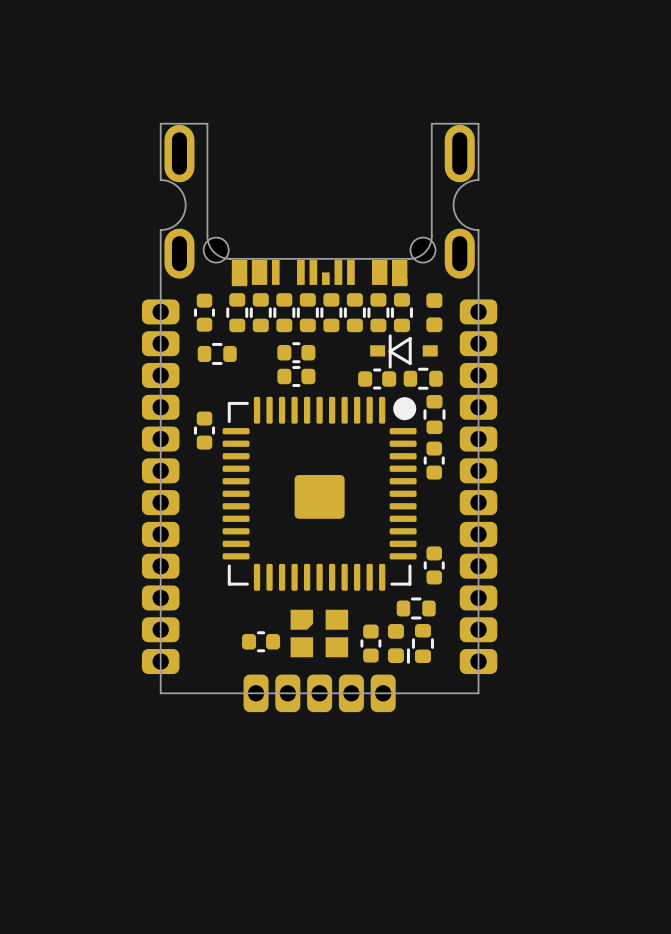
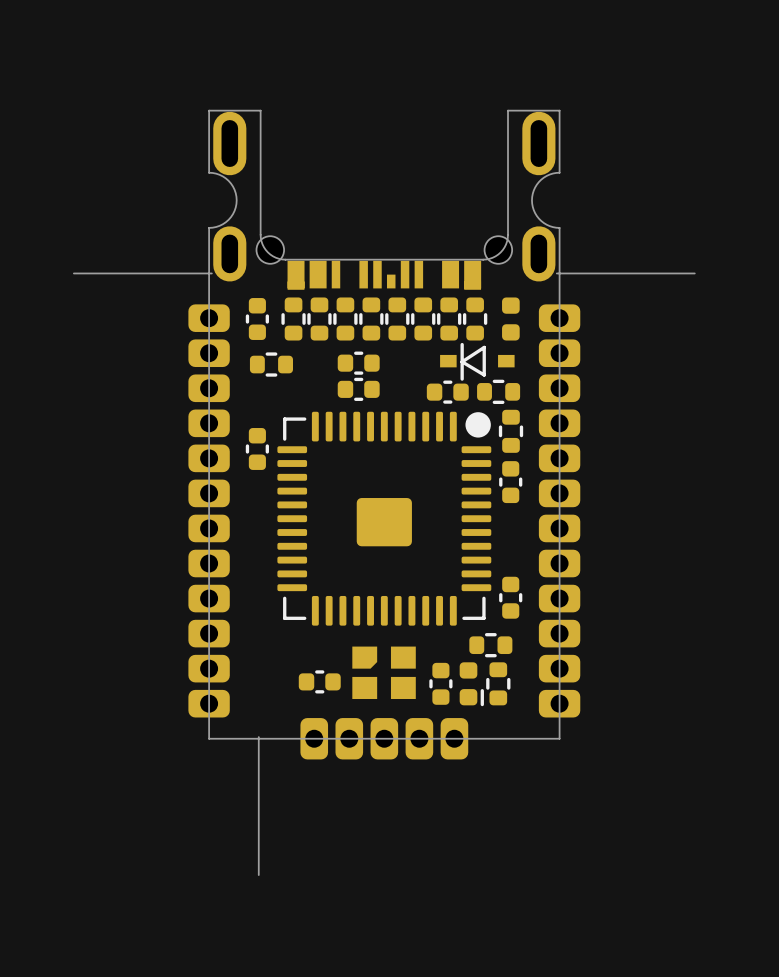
board edge: none -> (73, 273) (211, 273)
board edge: none -> (556, 273) (694, 273)
board edge: none -> (258, 737) (258, 875)

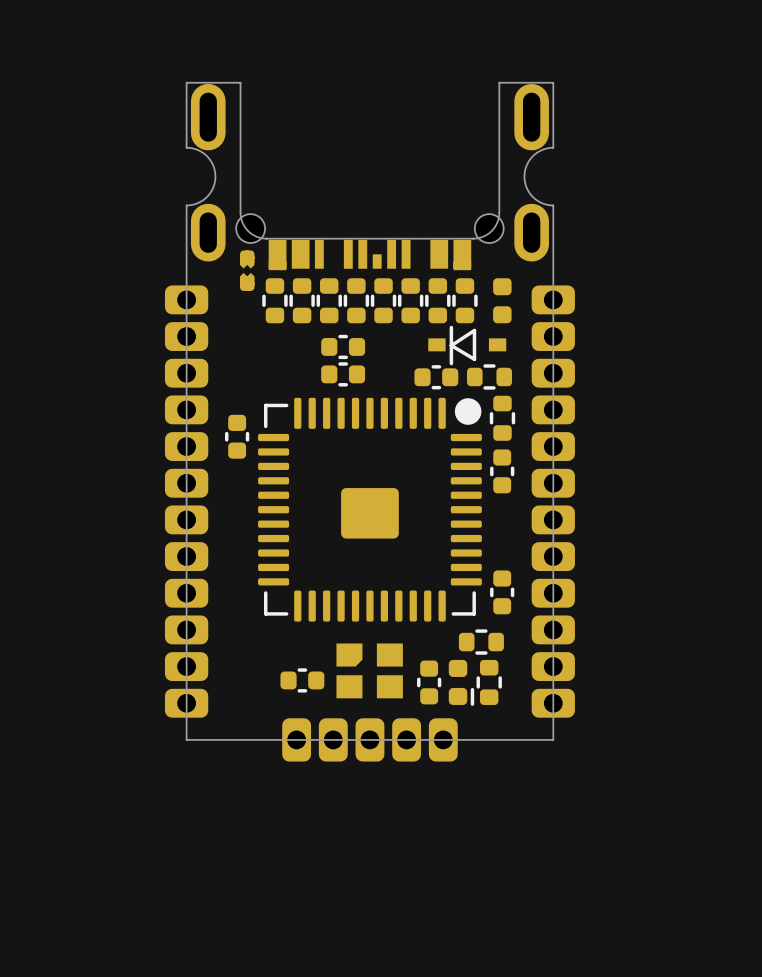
board edge: (73, 273) (211, 273) -> none
board edge: (556, 273) (694, 273) -> none
part: none -> (247, 270)
part: (257, 319) -> none
part: (271, 364) -> none
board edge: (258, 737) (258, 875) -> none

